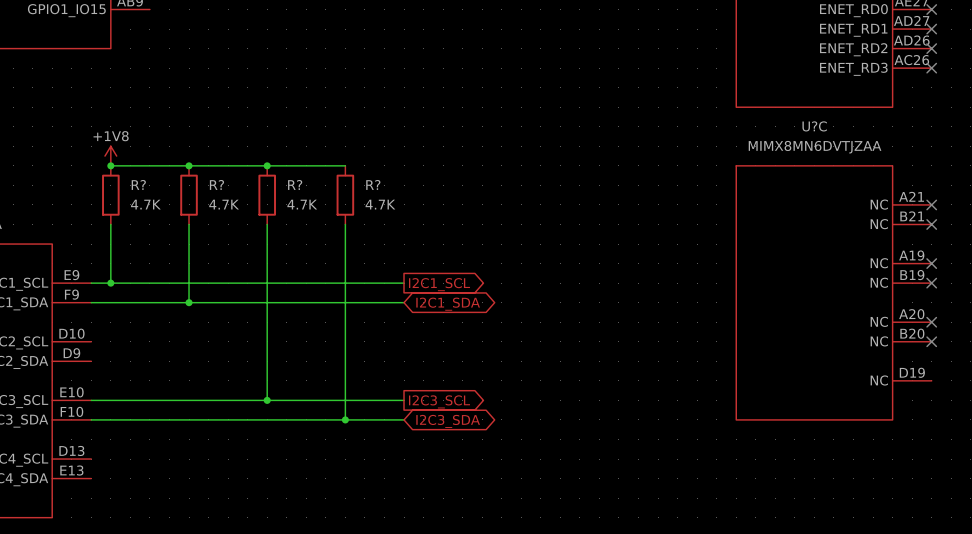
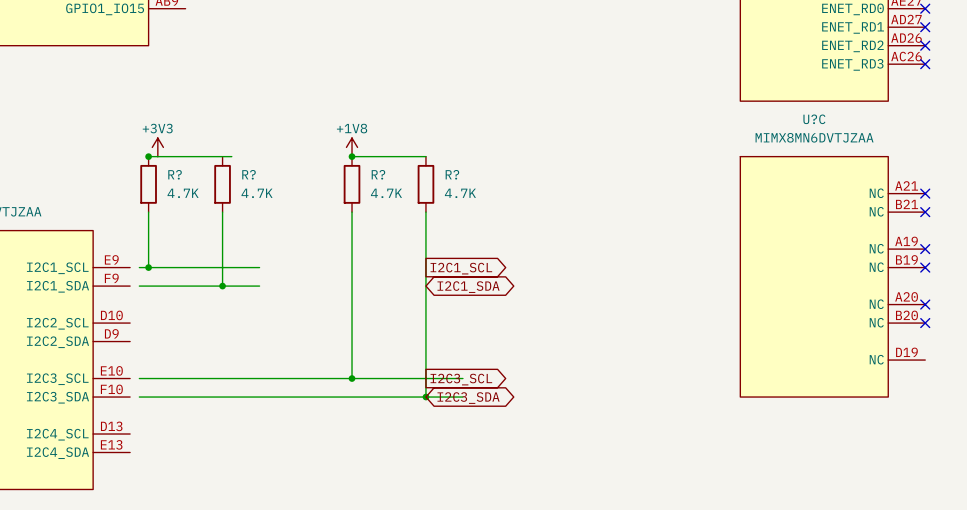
power symbol: +1V8 (110, 156) -> none
power symbol: none -> +3V3 (157, 147)
power symbol: none -> +1V8 (352, 147)
junction: (189, 165) -> none
wire: (198, 165) (325, 165) -> none
junction: (267, 165) -> none
junction: none -> (352, 156)
wire: none -> (370, 156) (425, 156)
R?: 4.7K (267, 195) -> none
R? position: (345, 195) -> (352, 184)
R?: none -> 4.7K (425, 184)
wire: (267, 224) (267, 400) -> (352, 212) (352, 378)
wire: (345, 224) (345, 419) -> none
wire: none -> (425, 212) (425, 397) (462, 397)
wire: (91, 283) (101, 283) -> none
wire: (228, 283) (404, 283) -> none
wire: (91, 302) (101, 302) -> none
wire: (228, 302) (404, 302) -> none
wire: (91, 400) (101, 400) -> none
junction: (267, 400) -> none
wire: none -> (425, 378) (462, 378)
wire: (91, 419) (101, 419) -> none
junction position: (345, 419) -> (352, 378)
junction: none -> (425, 397)

